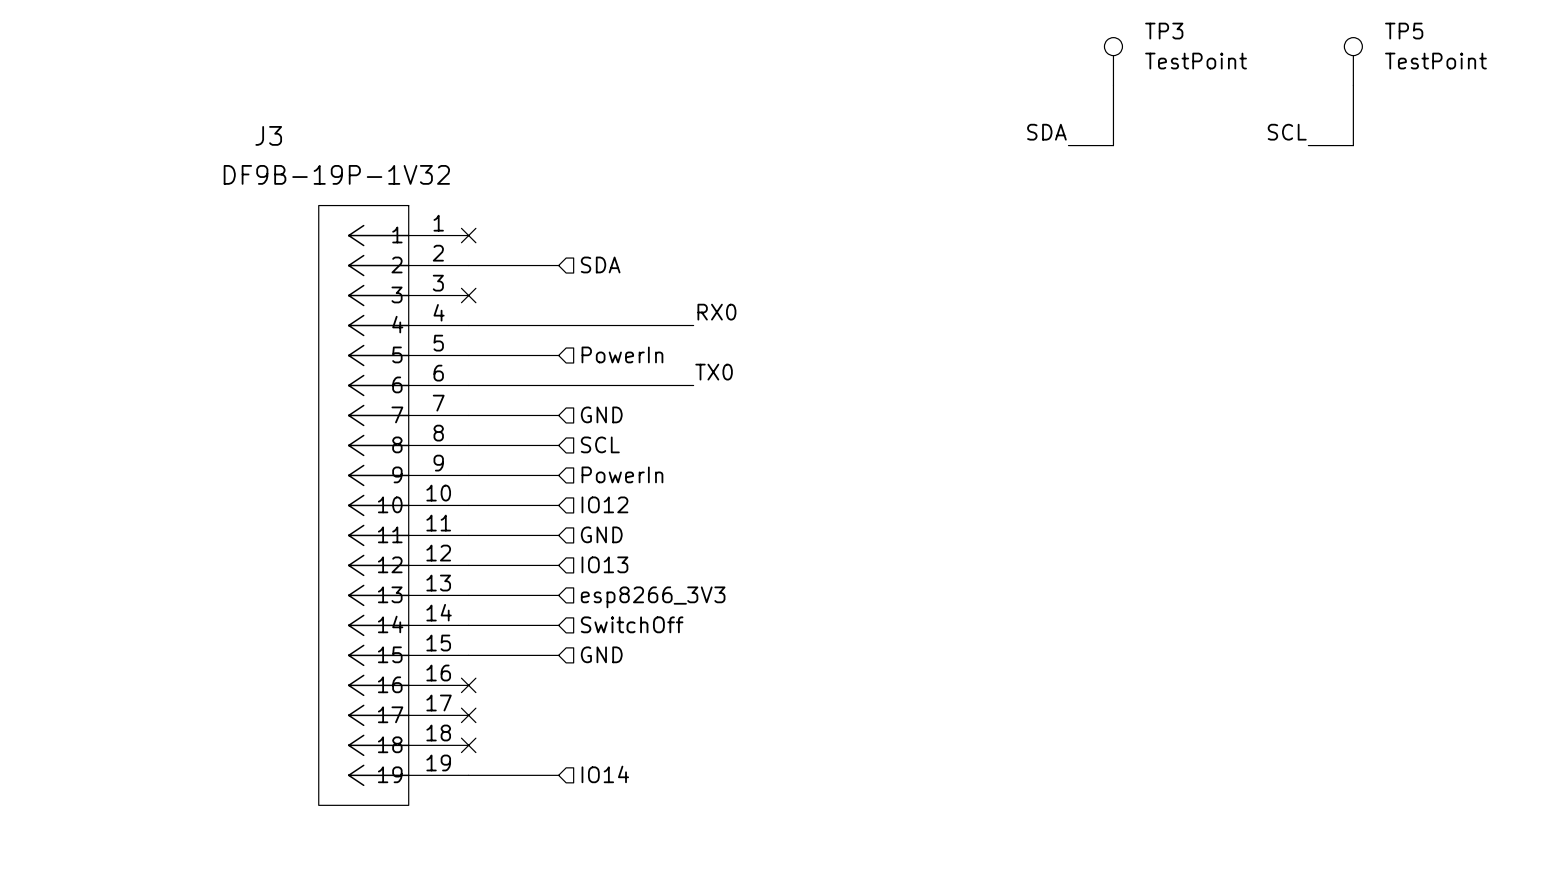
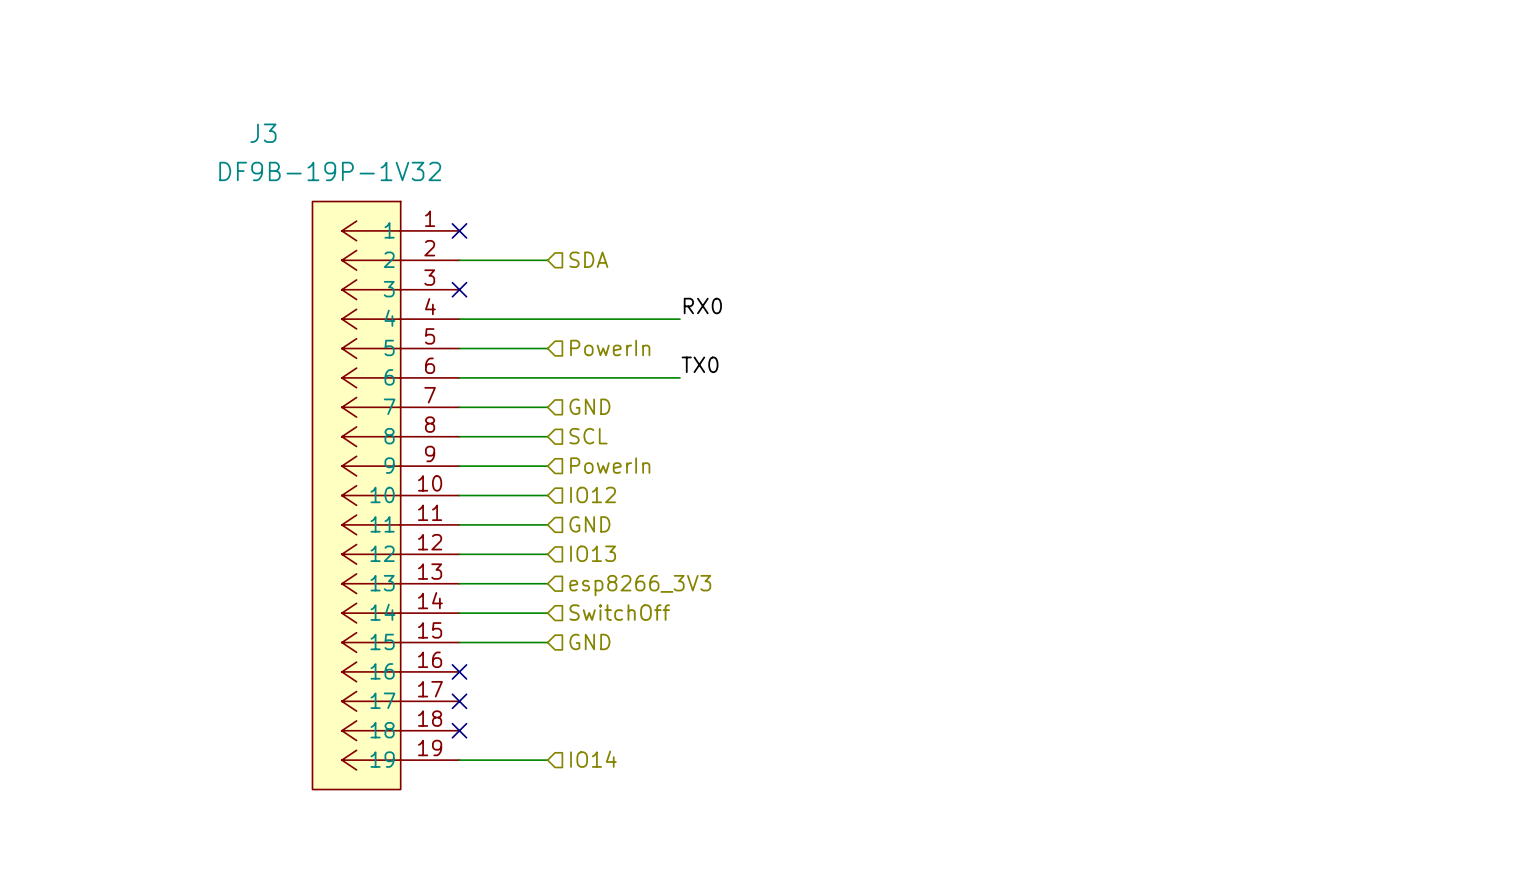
TP3: TestPoint (1113, 61) -> none
TP5: TestPoint (1353, 61) -> none
wire: (1113, 85) (1113, 145) (1068, 145) -> none
wire: (1353, 85) (1353, 145) (1308, 145) -> none
label: SDA (1046, 132) -> none
label: SCL (1287, 132) -> none

